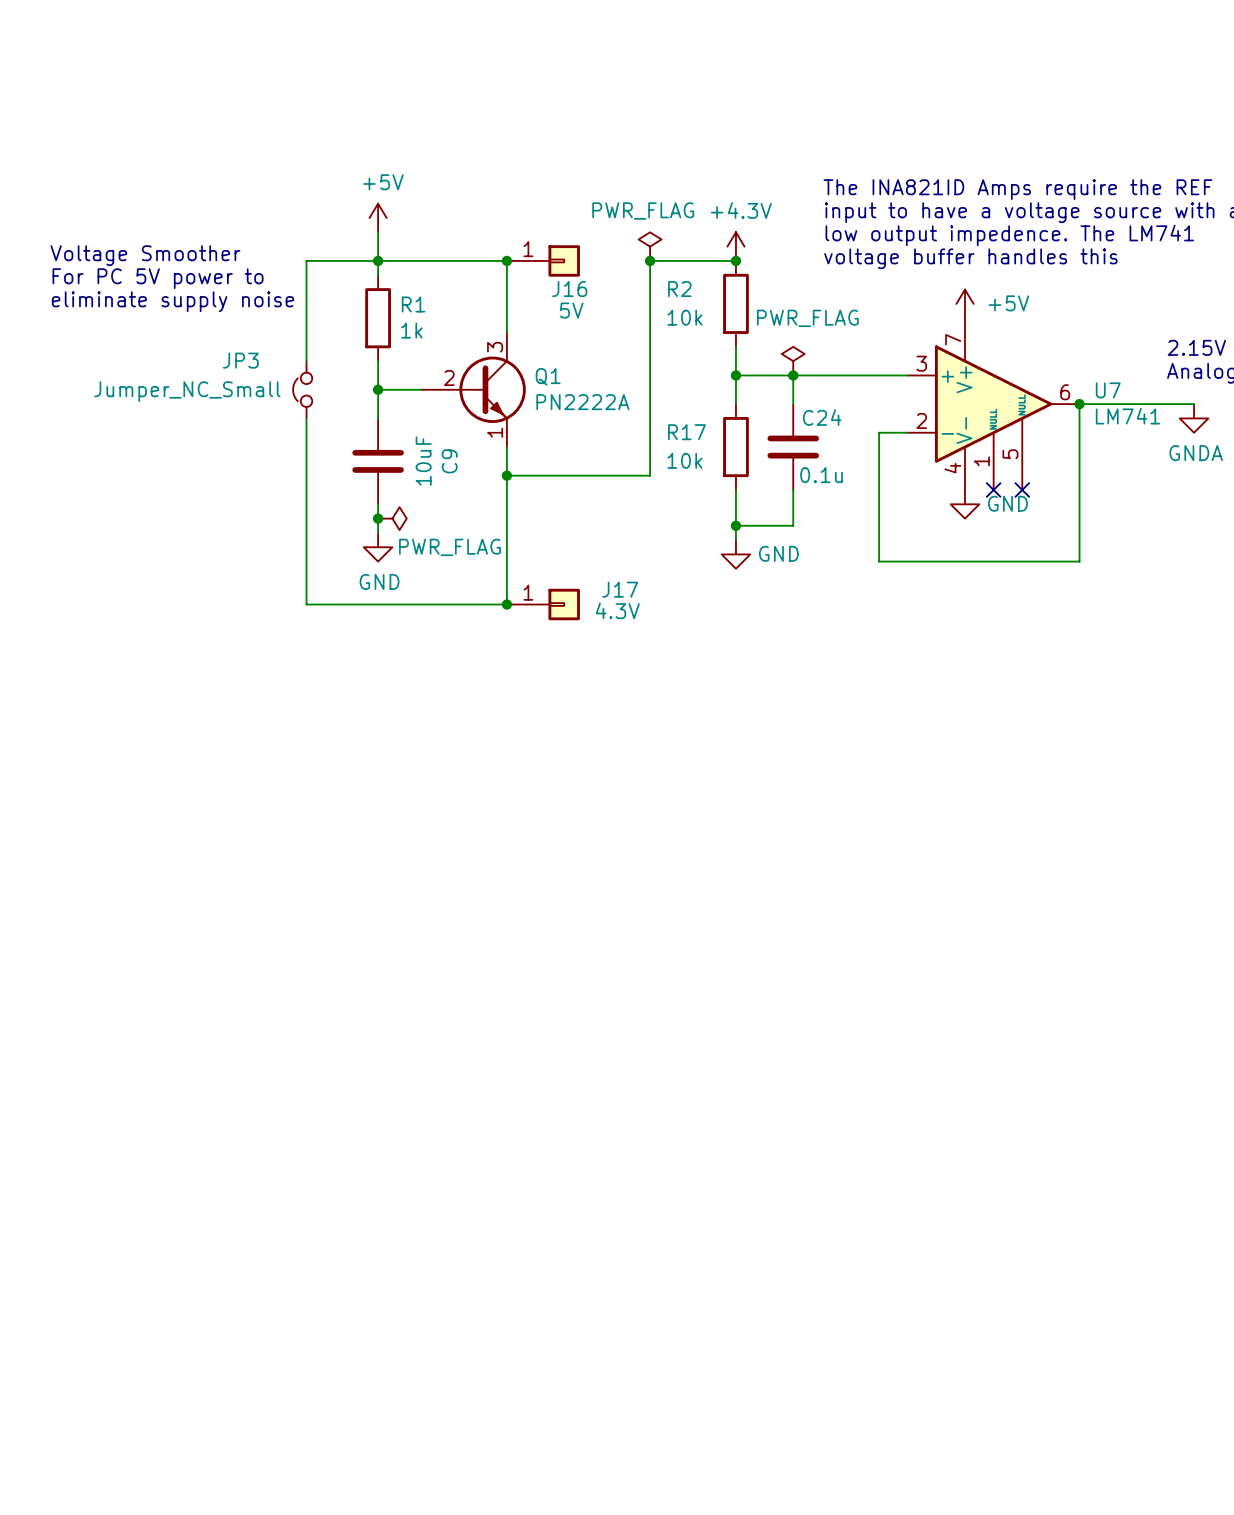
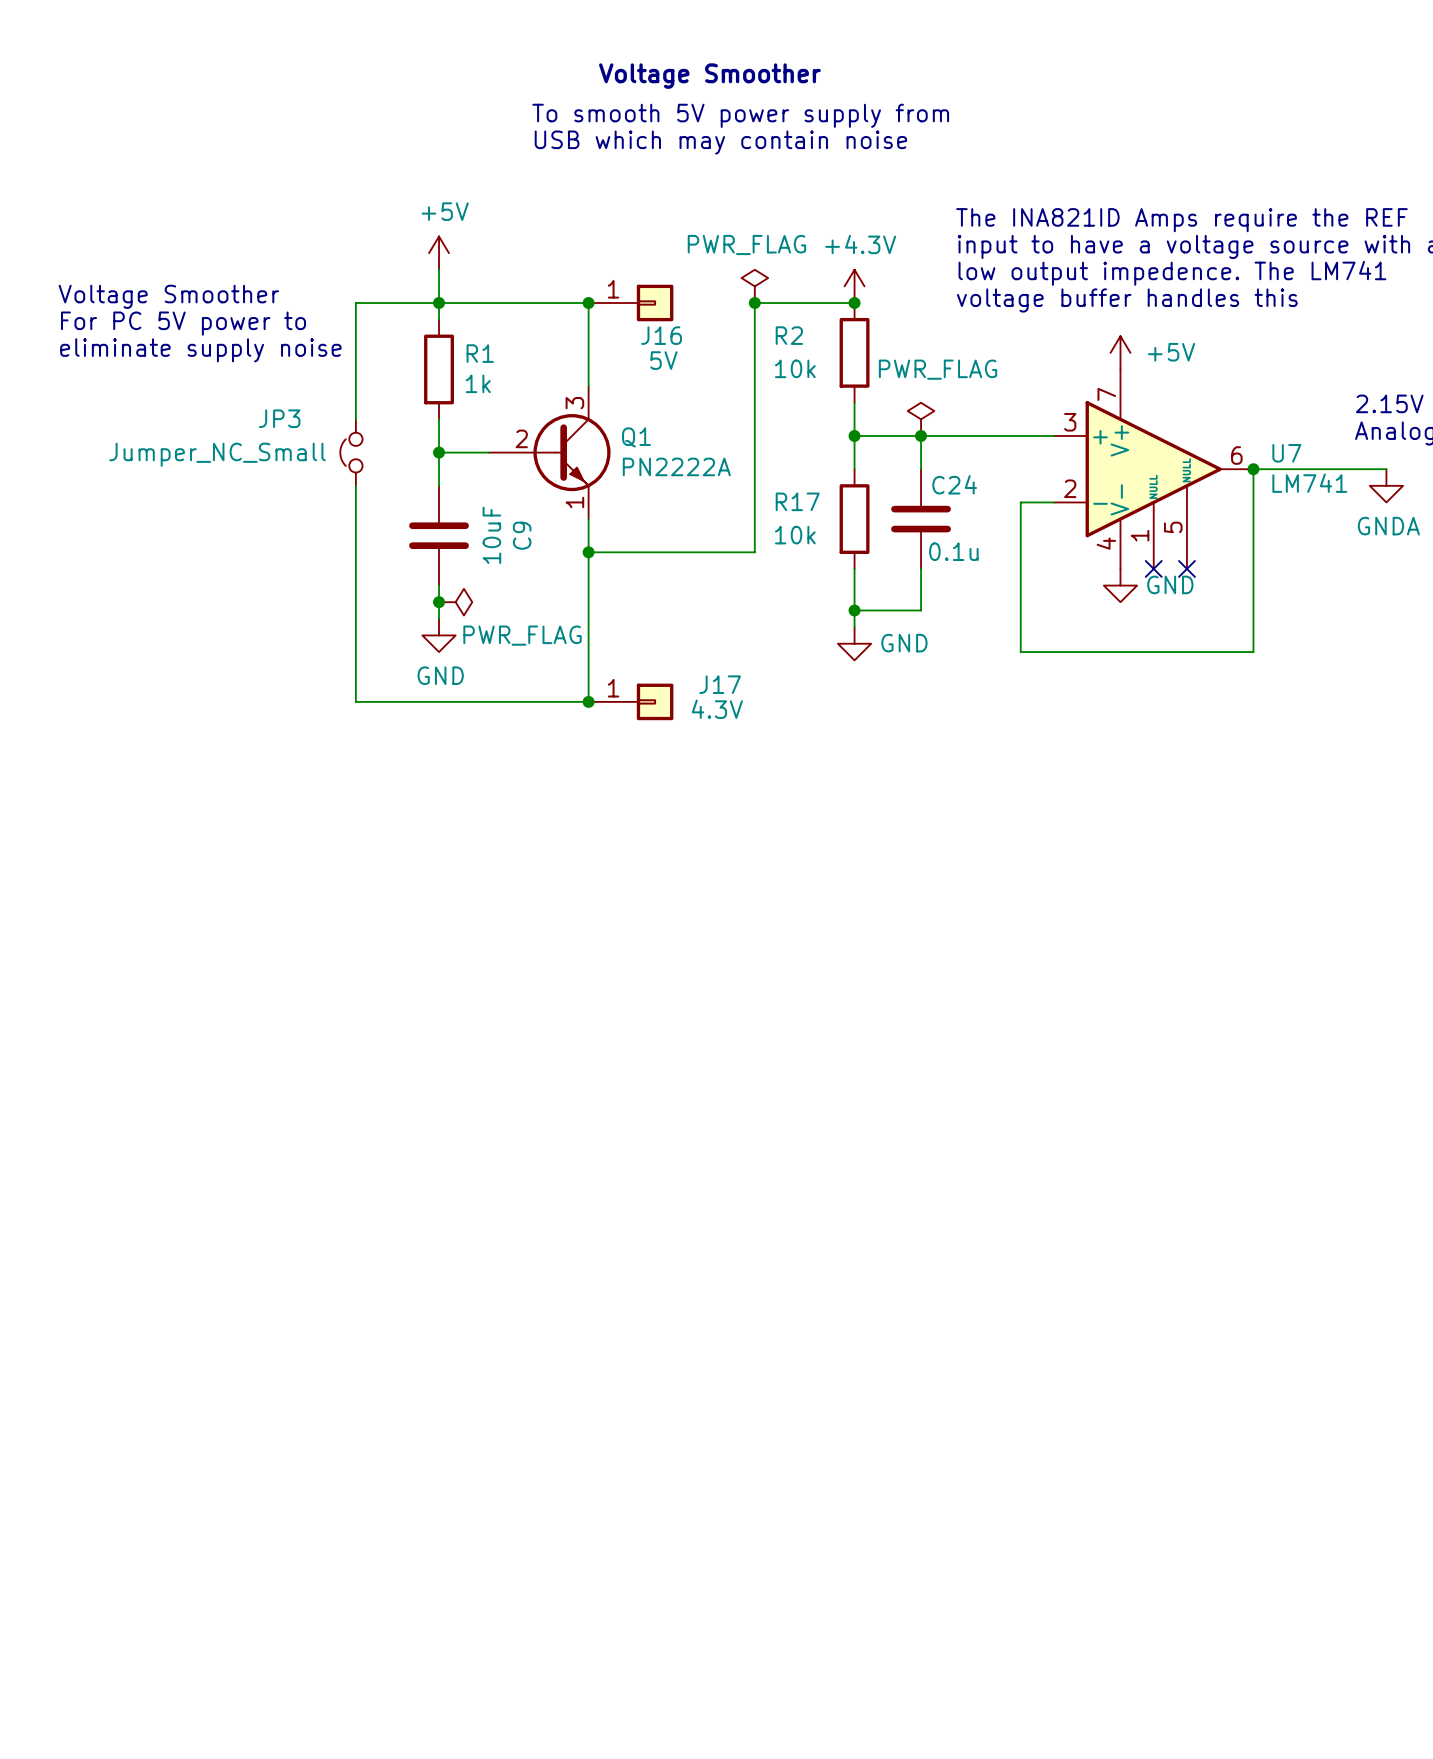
text: none -> Voltage Smoother (709, 76)
text: none -> To smooth 5V power supply from (740, 115)
text: none -> USB which may contain noise (720, 142)

